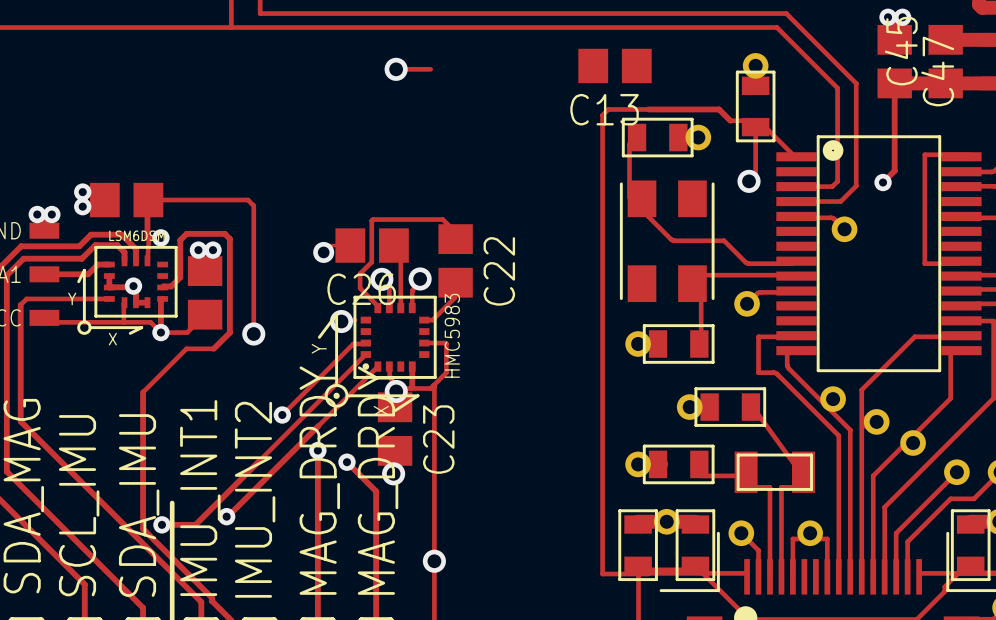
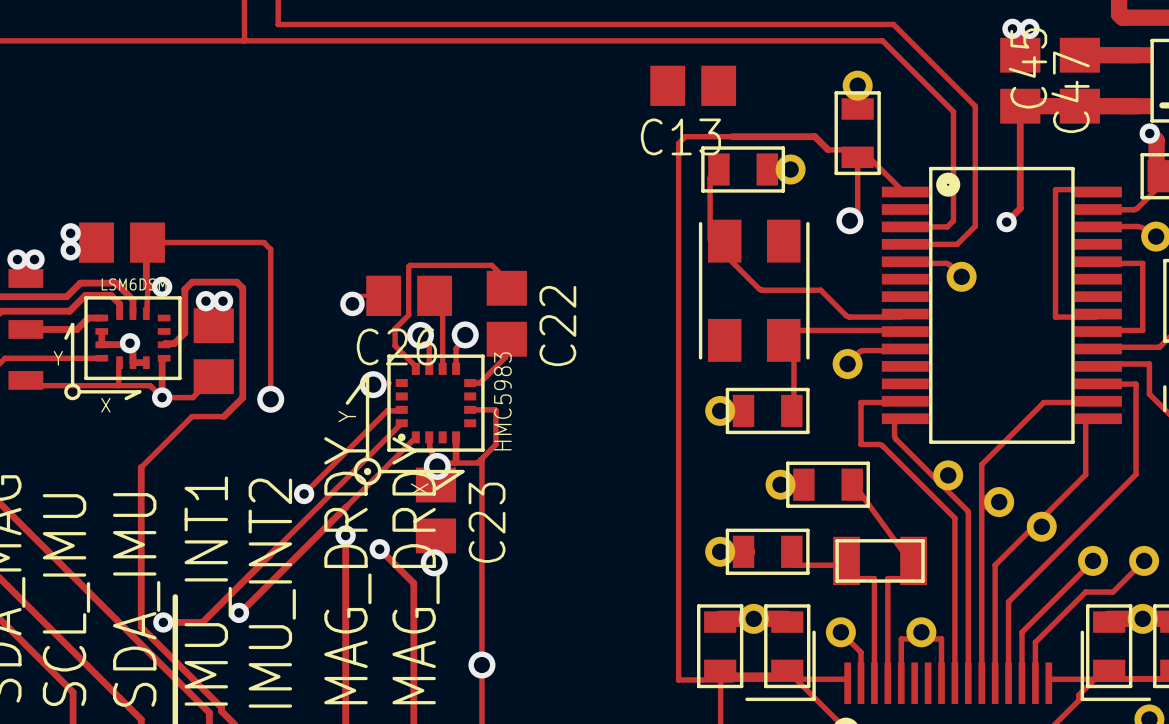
track: (396, 69) (430, 69) -> none
via: (396, 69) -> none

